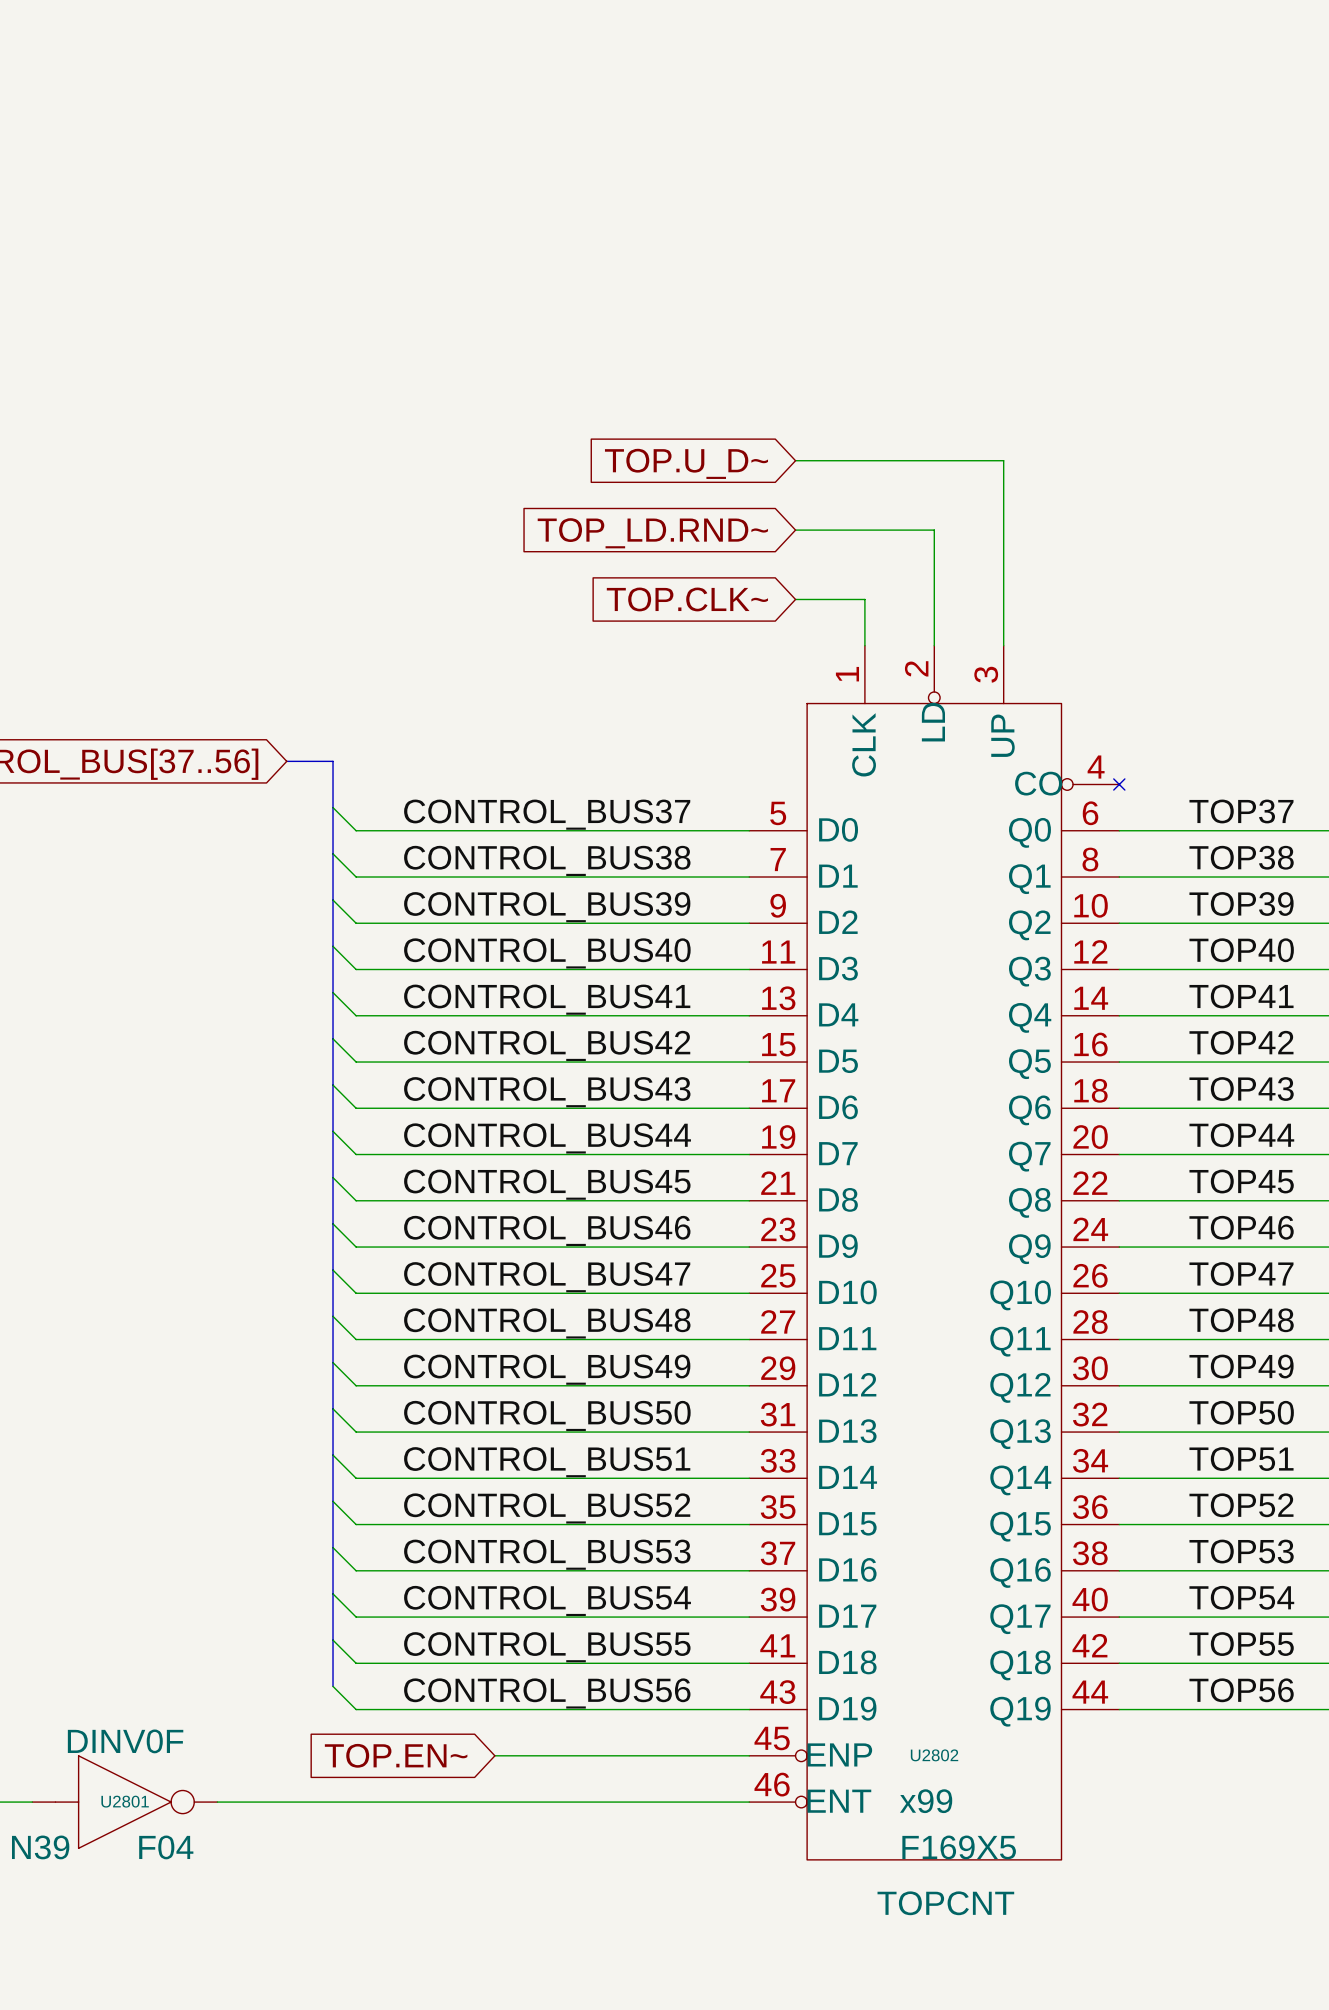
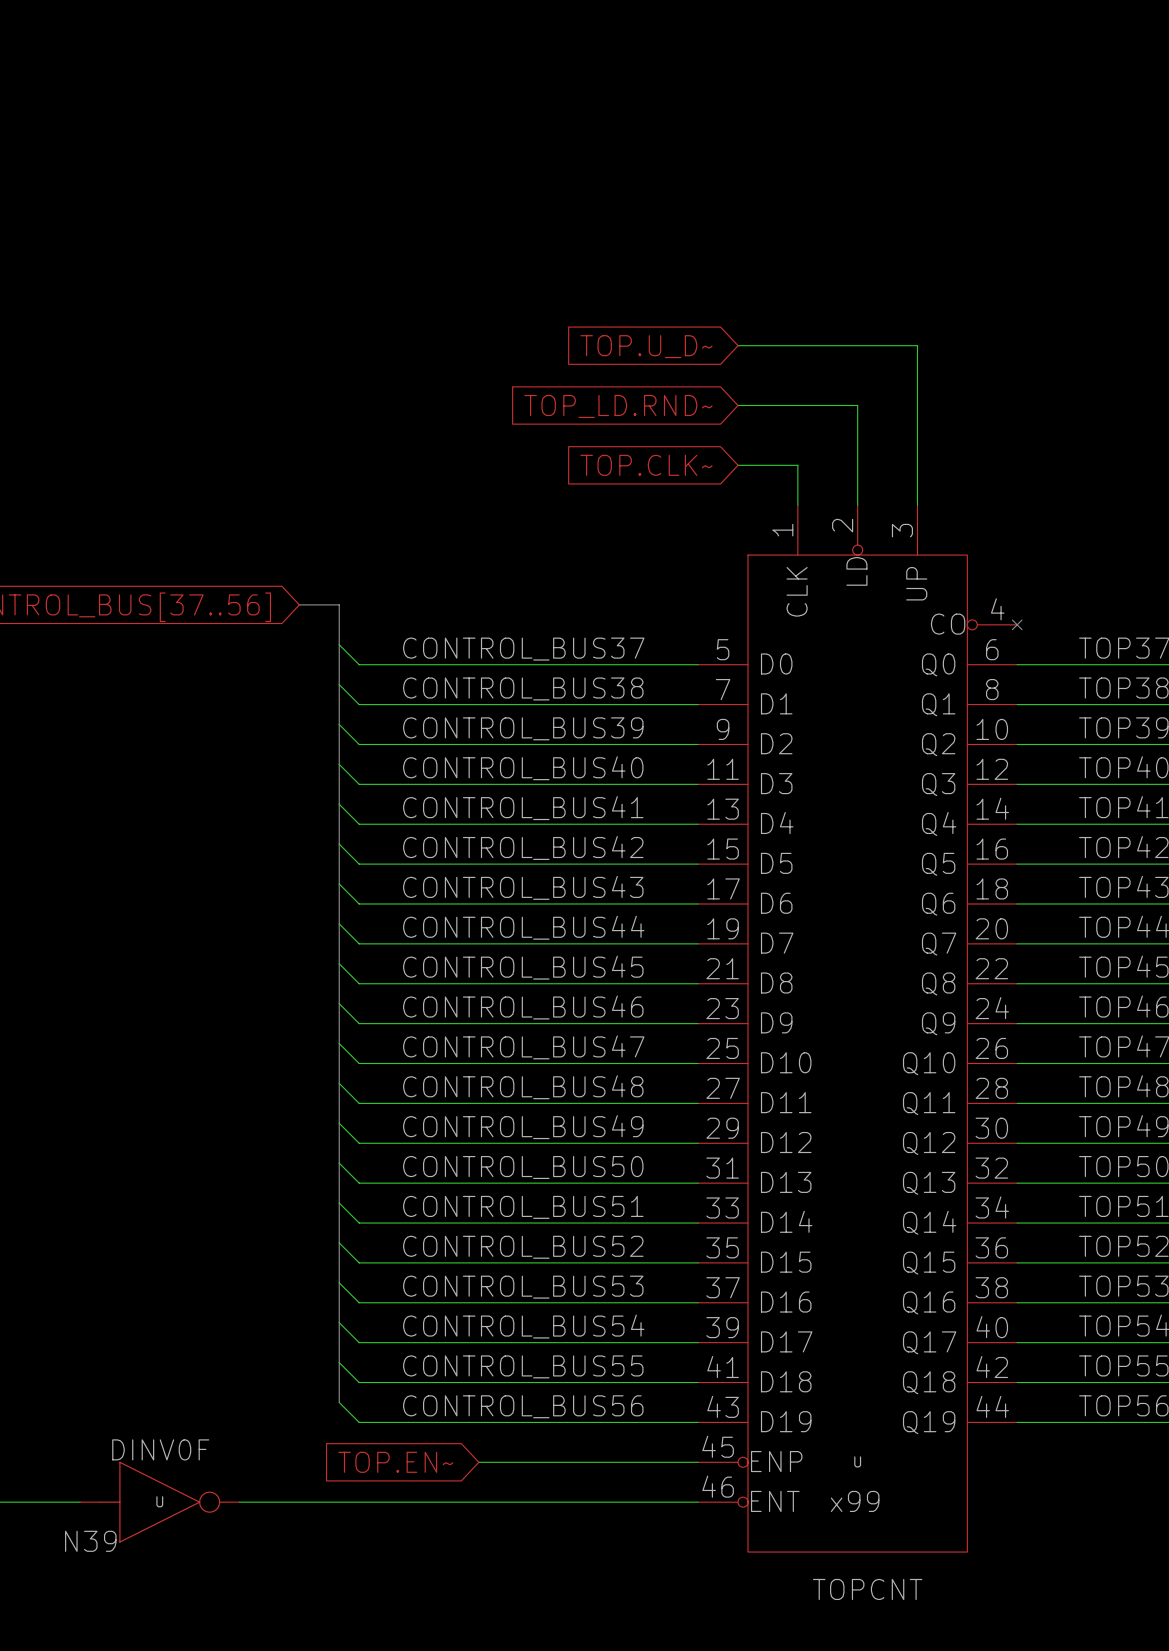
U2802 name: U2802 (934, 1755) -> U (857, 1461)
U2801 name: U2801 (125, 1801) -> U (159, 1501)
U2801 value: F04 (166, 1847) -> none
U2802 value: F169X5 (959, 1847) -> none

